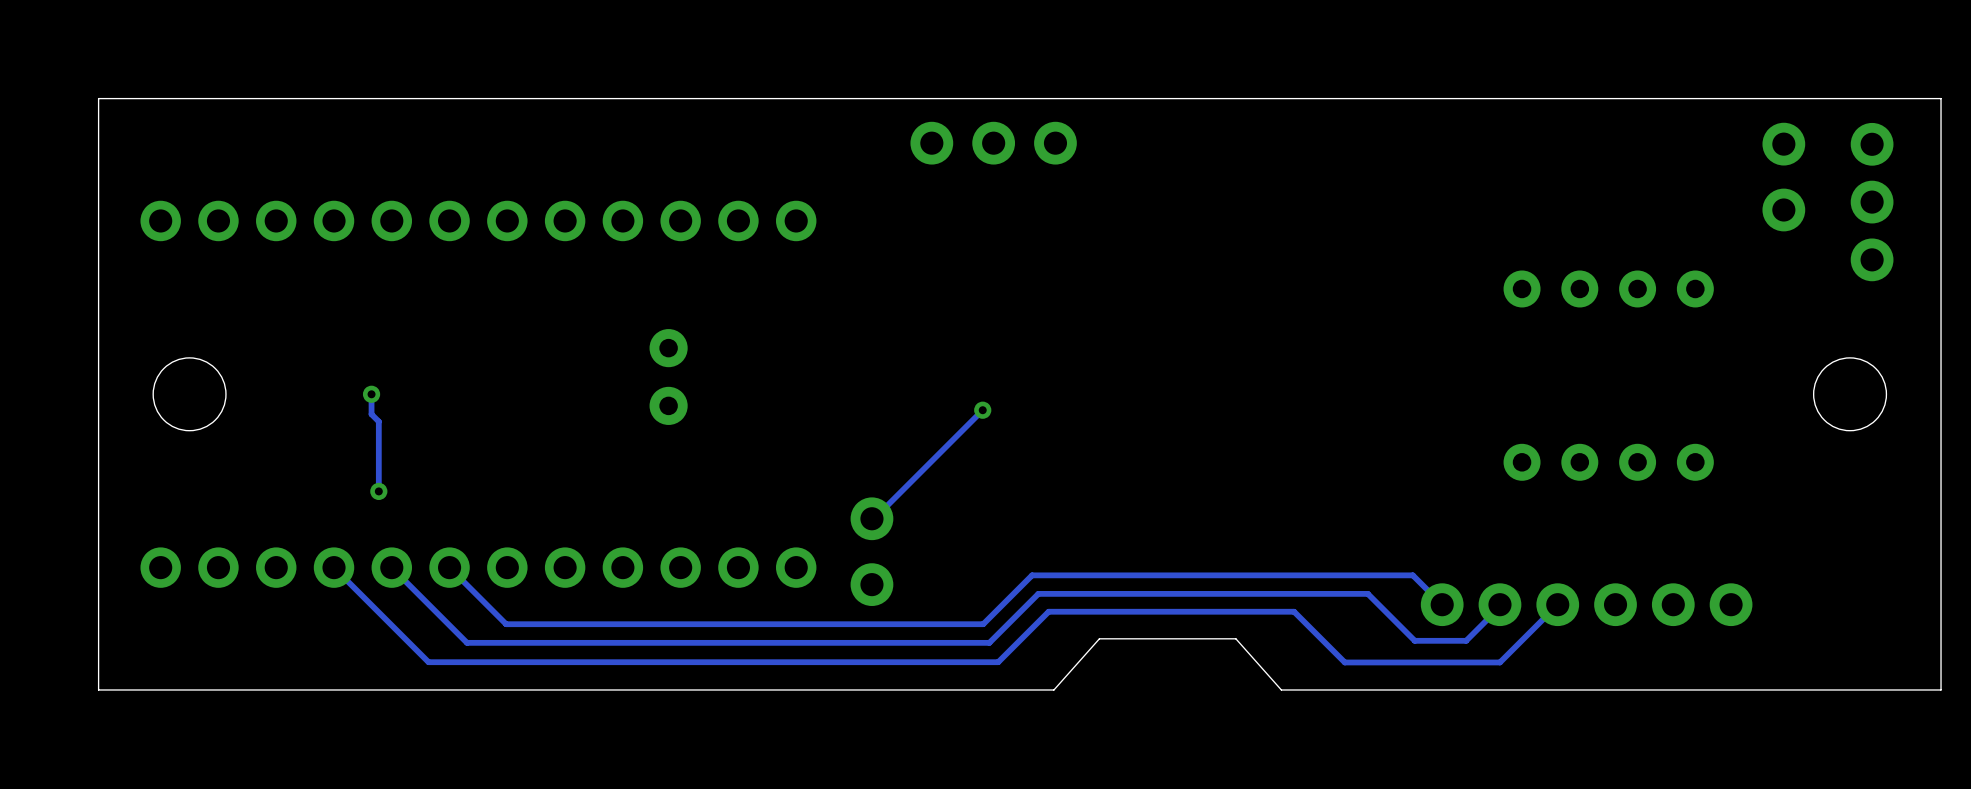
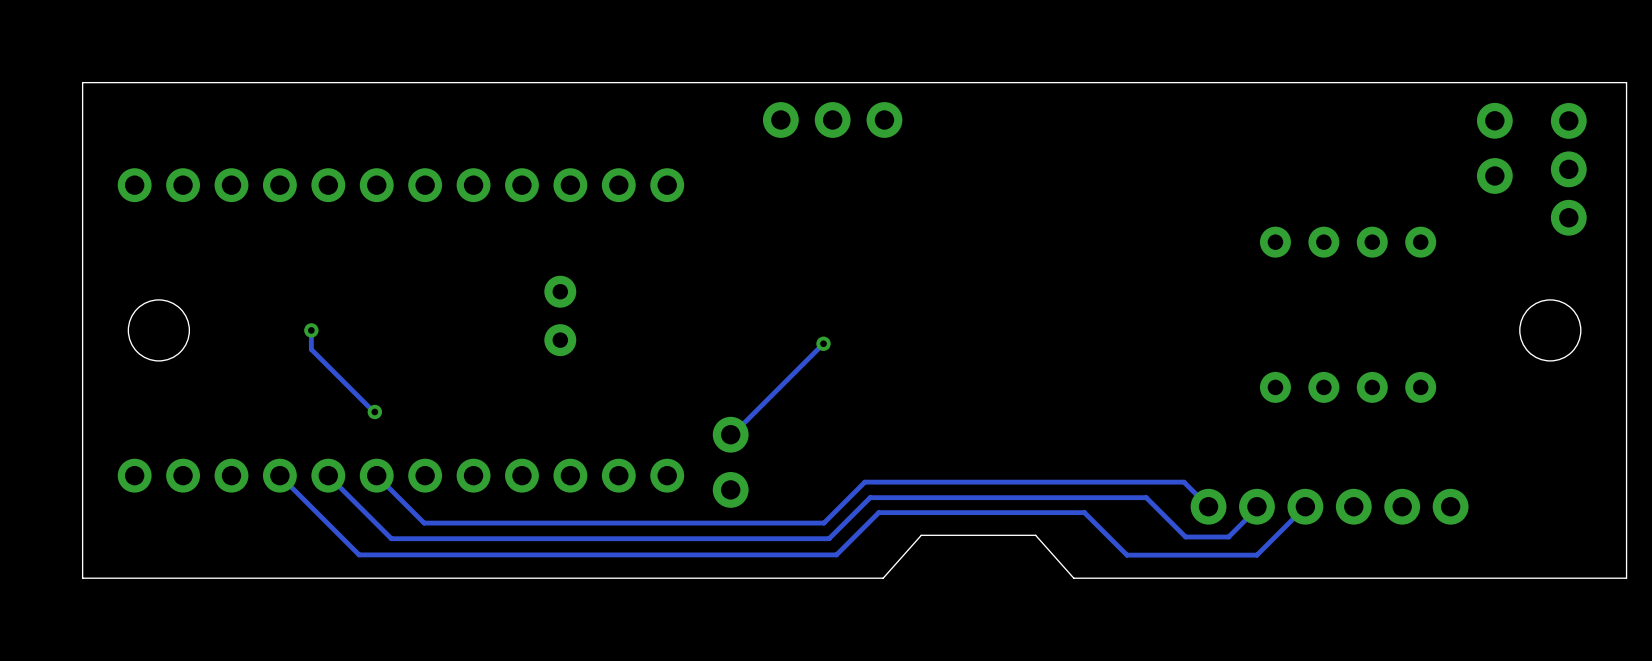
track: (371, 414) (378, 421) (378, 491) -> (311, 347) (311, 349) (374, 411)
via position: (378, 491) -> (374, 411)

